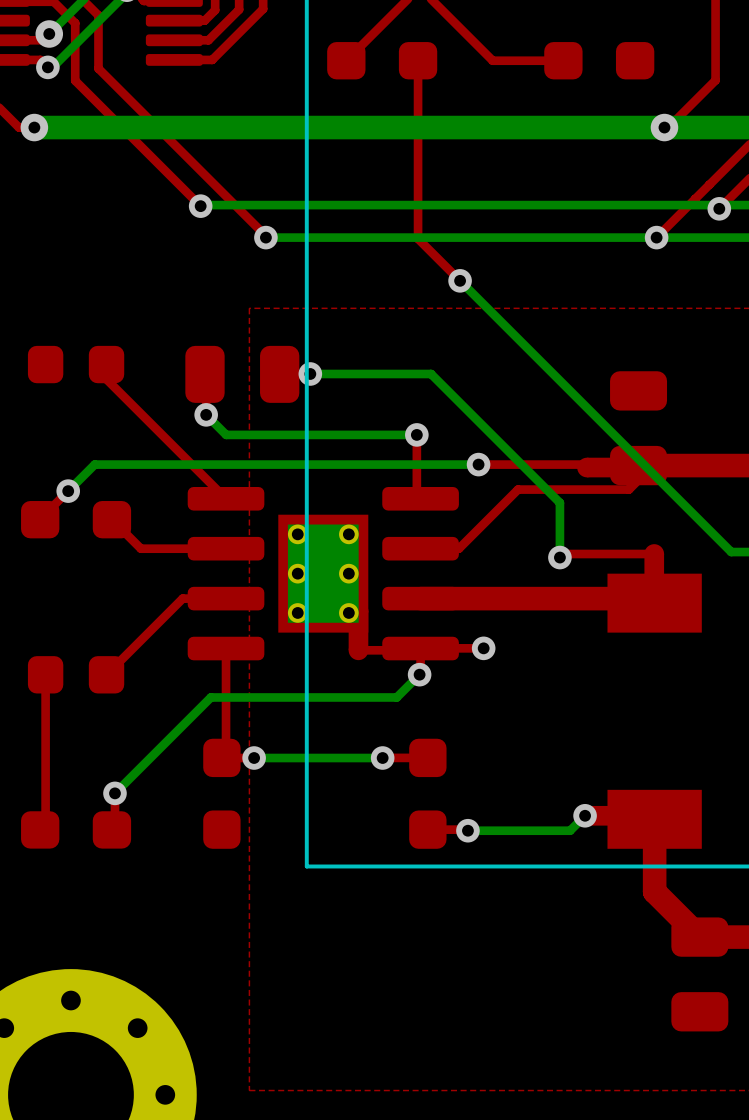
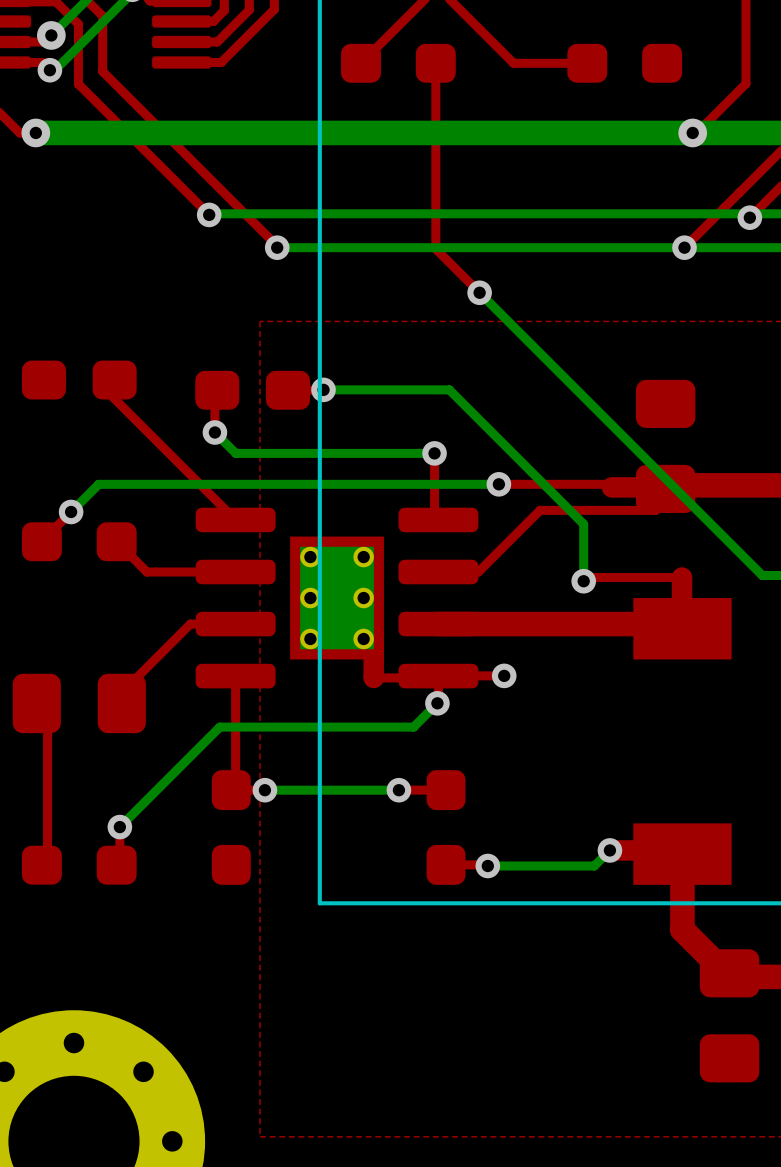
part footprint: [27, 345, 125, 384] -> [21, 360, 137, 400]
part footprint: [185, 345, 300, 403] -> [195, 370, 310, 410]
part footprint: [610, 371, 668, 486] -> [635, 379, 696, 514]
part footprint: [27, 656, 125, 694] -> [12, 673, 146, 734]
part footprint: [671, 917, 729, 1032] -> [699, 949, 760, 1083]

